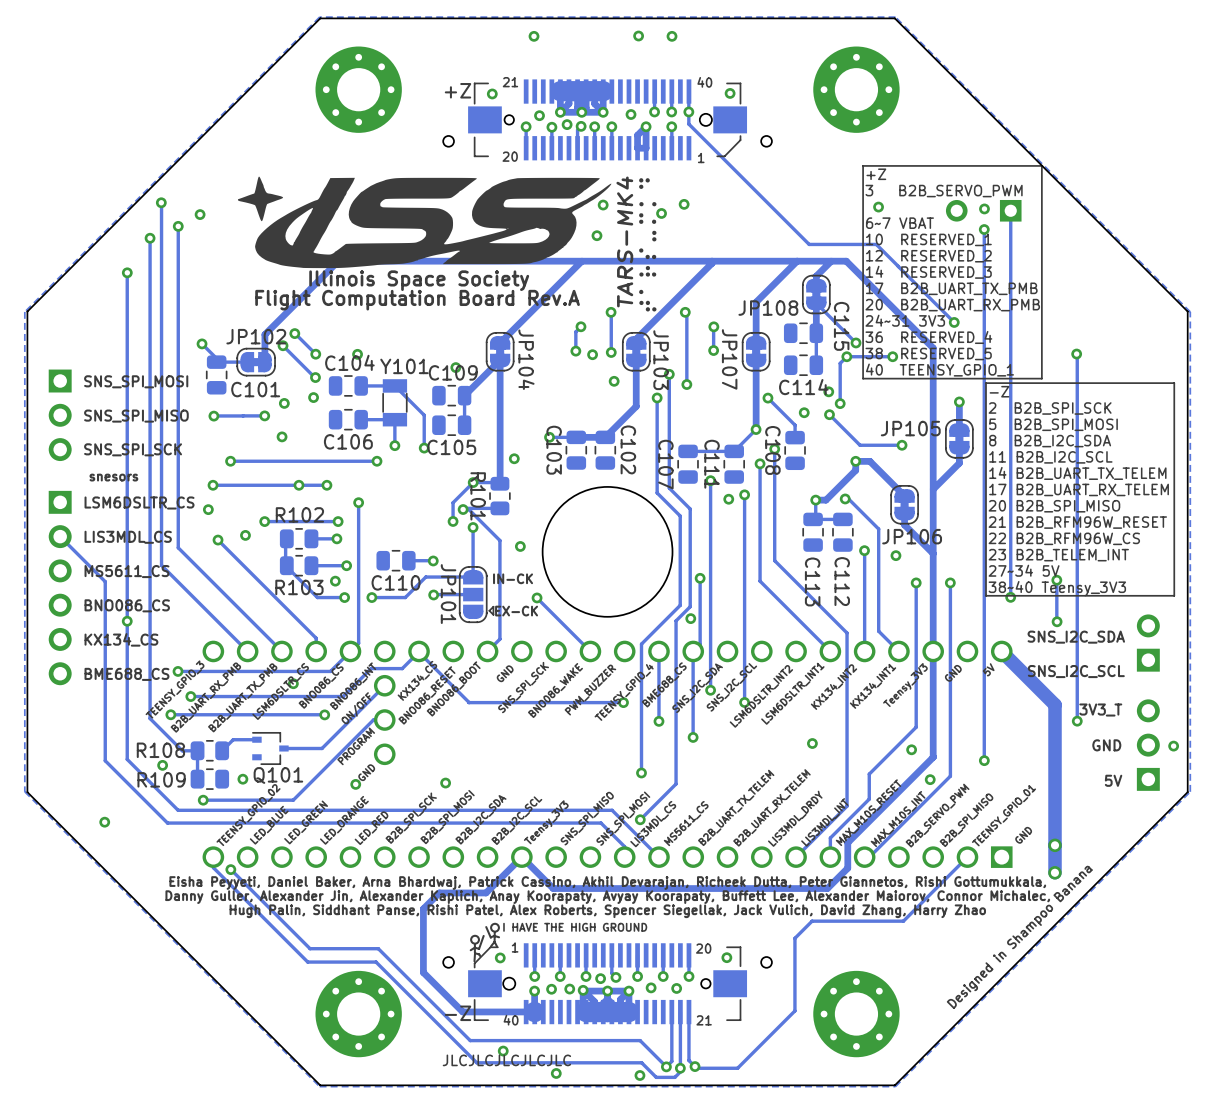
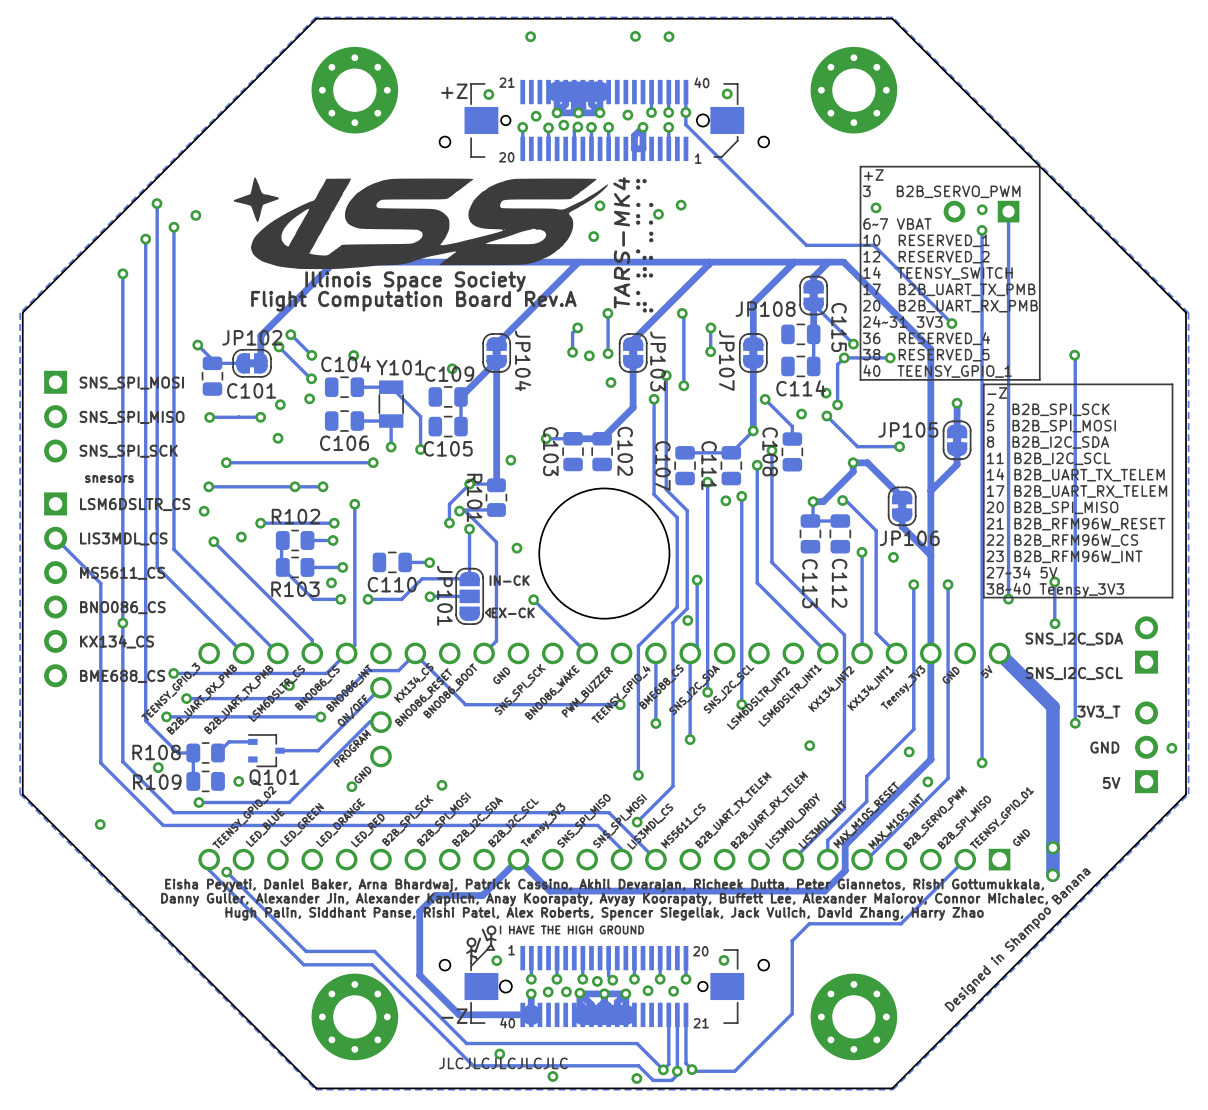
text: 14 RESERVED_3 (928, 272) -> 14 TEENSY_SWITCH (938, 273)
text: 23 B2B_TELEM_INT (1058, 555) -> 23 B2B_RFM96W_INT (1064, 556)

